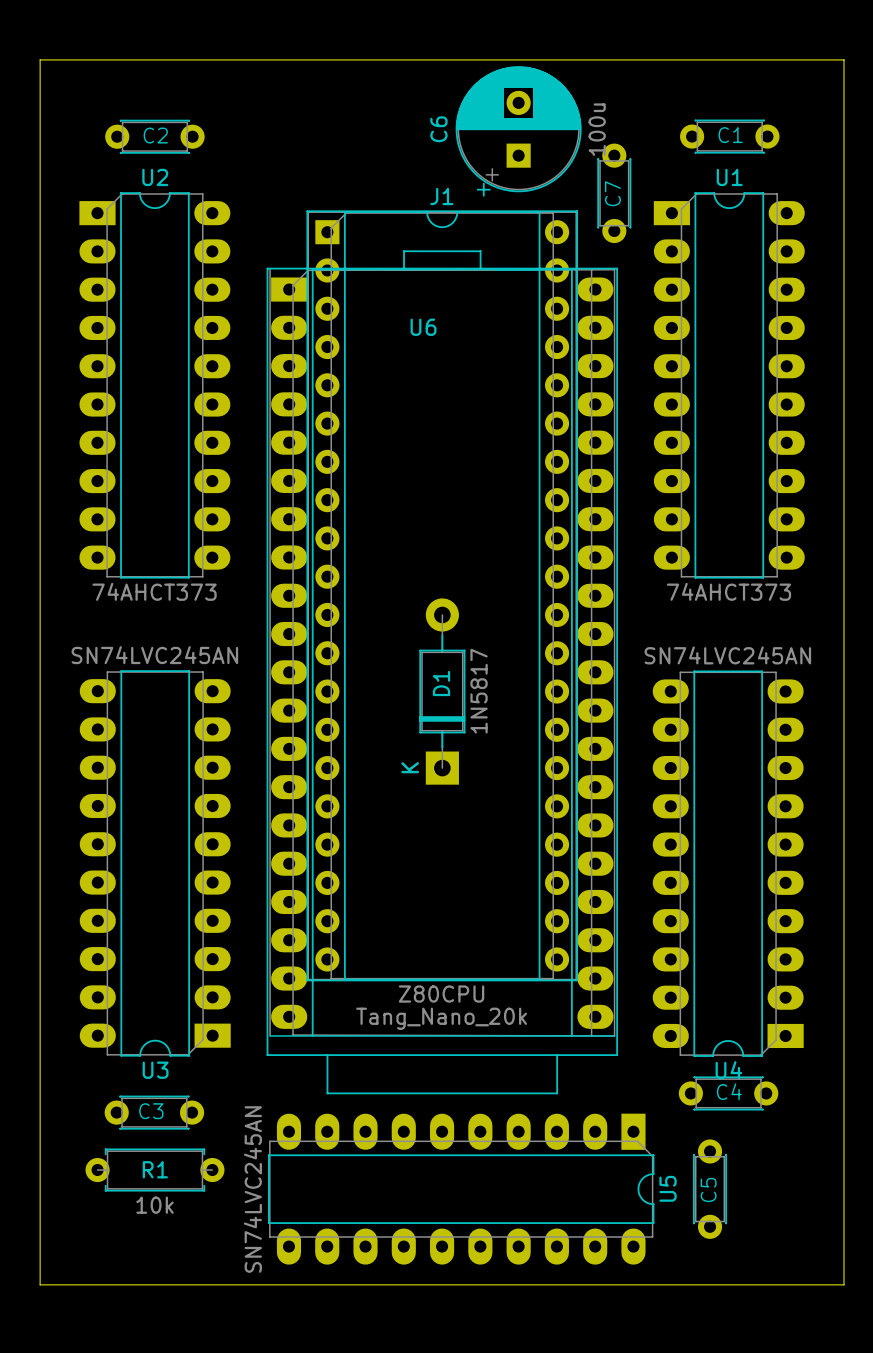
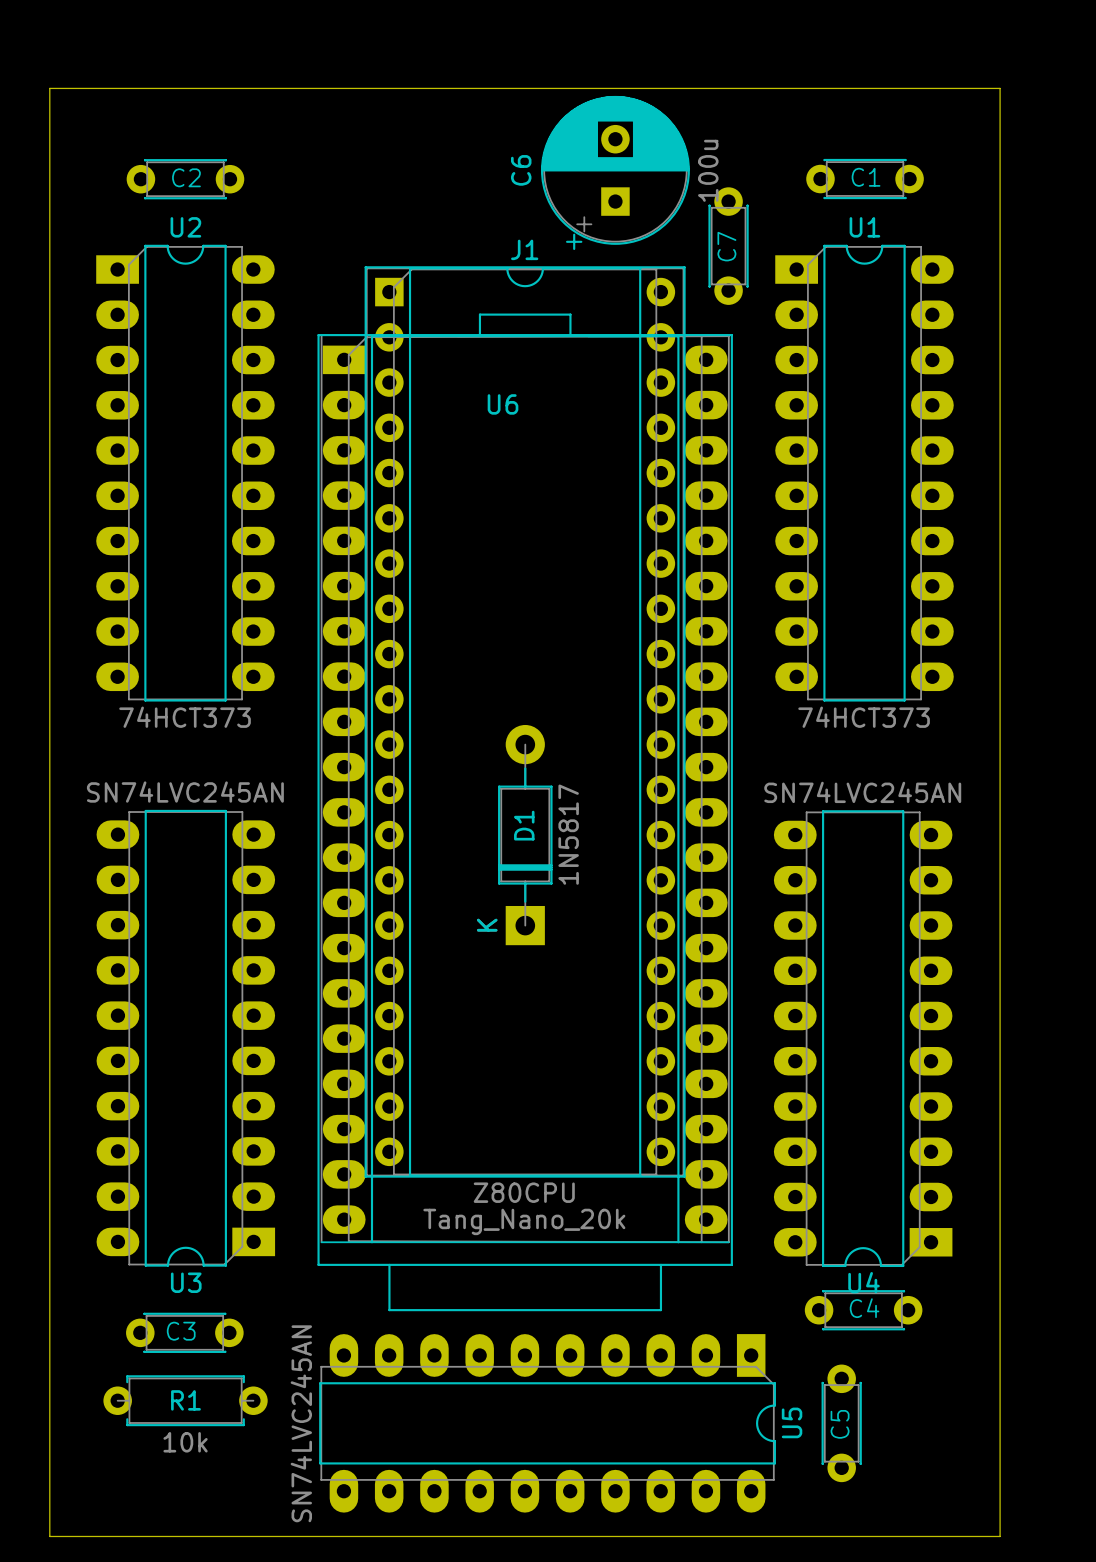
U2 value: 74AHCT373 (154, 591) -> 74HCT373 (185, 717)
U1 value: 74AHCT373 (728, 591) -> 74HCT373 (864, 717)

